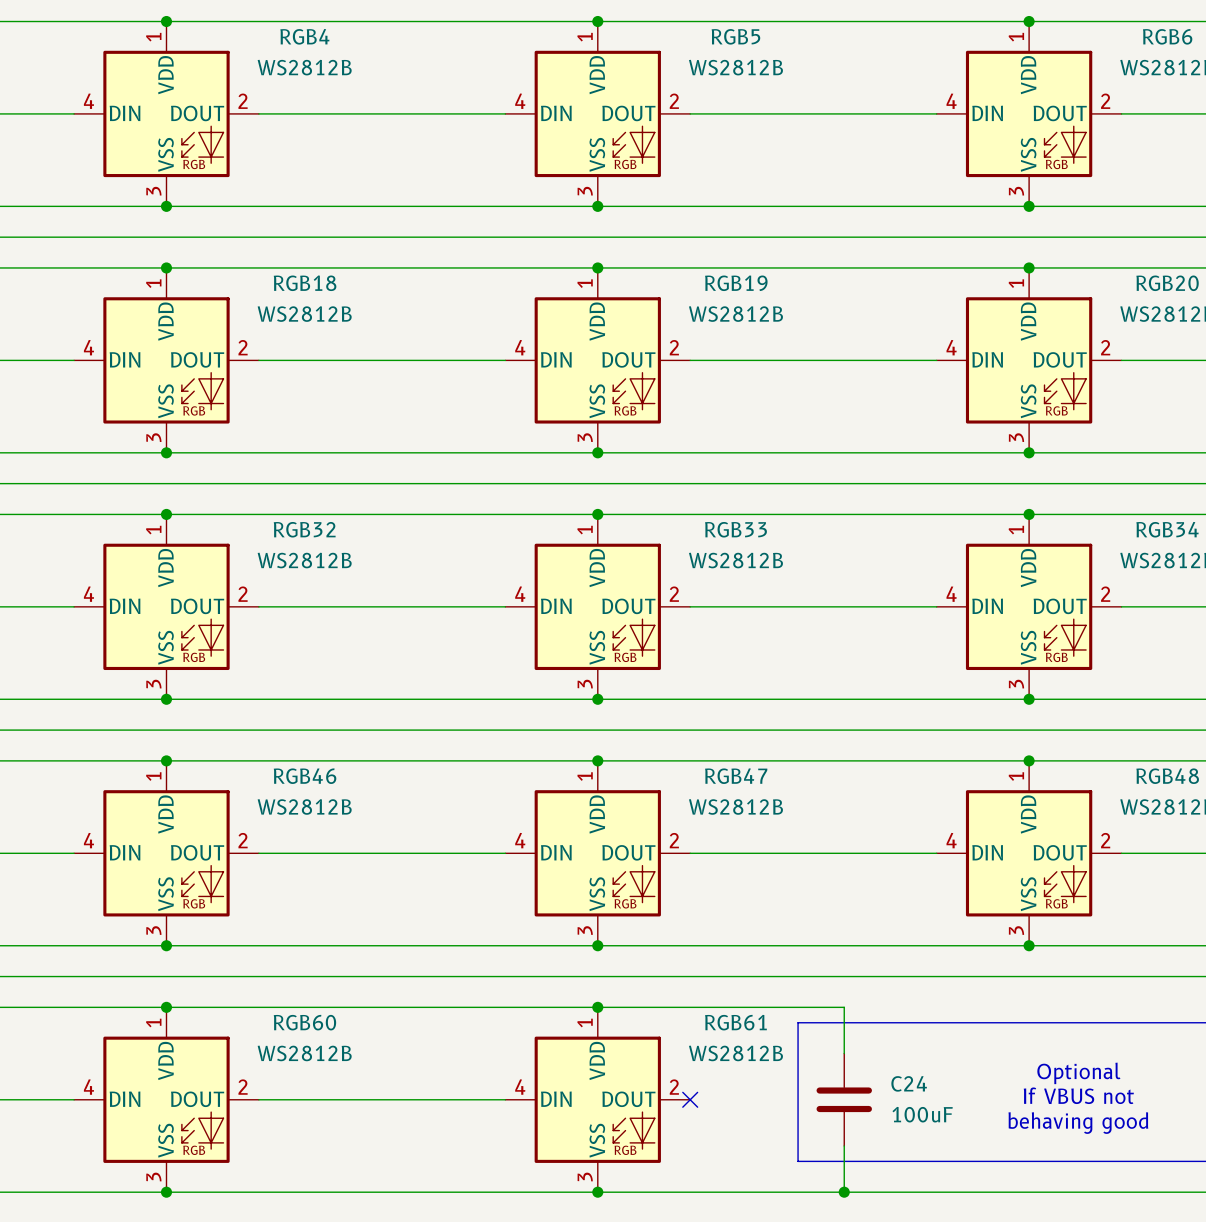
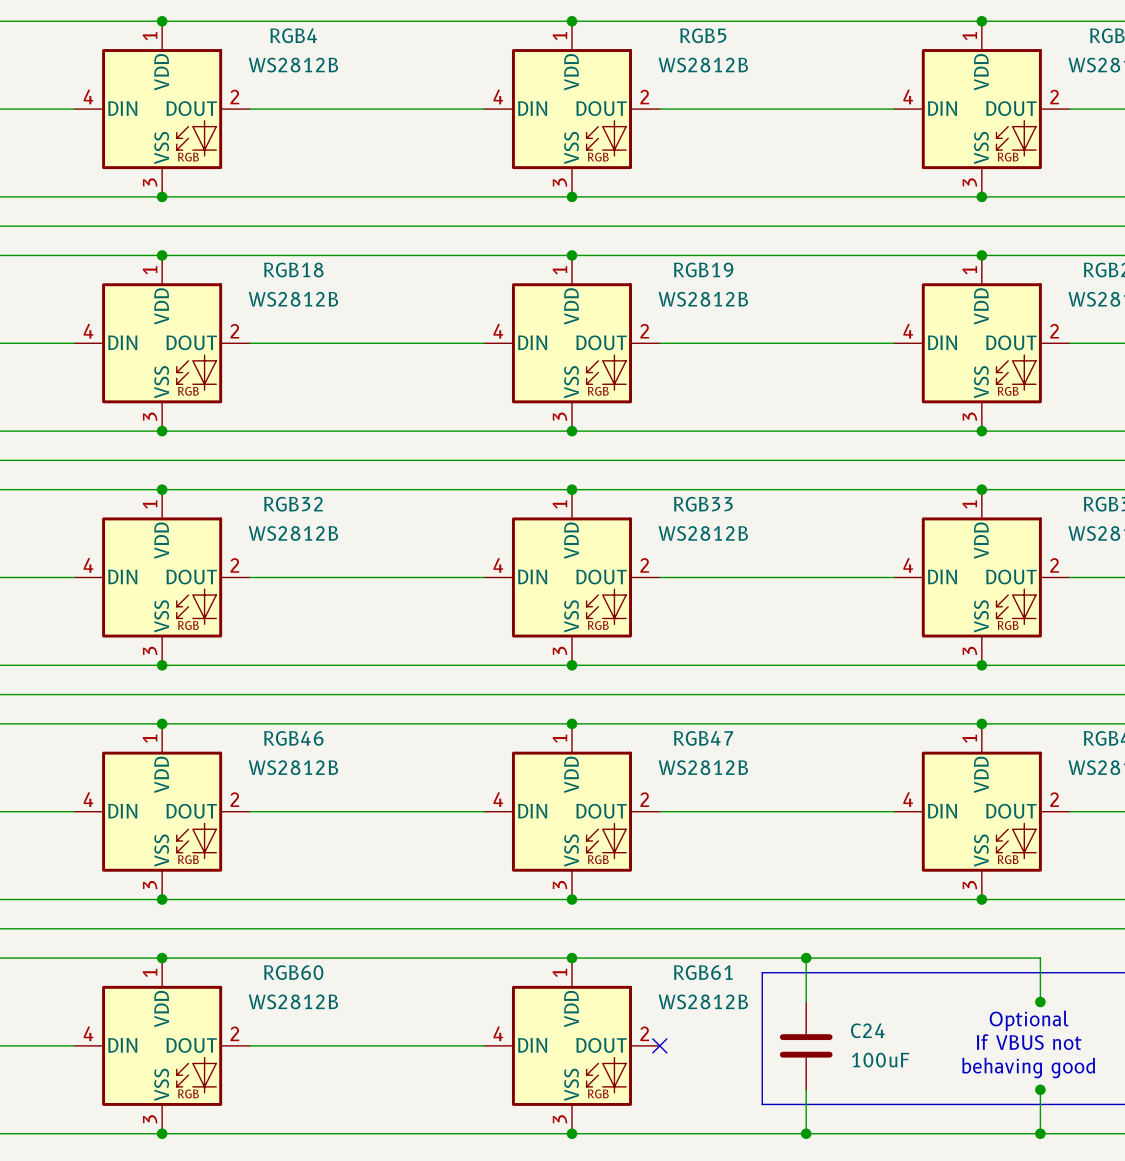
wire: none -> (806, 958) (1040, 958) (1040, 1001)
junction: none -> (806, 958)
junction: none -> (1040, 1001)
wire: none -> (1040, 1089) (1040, 1133)
junction: none -> (1040, 1089)
junction: none -> (1040, 1133)

